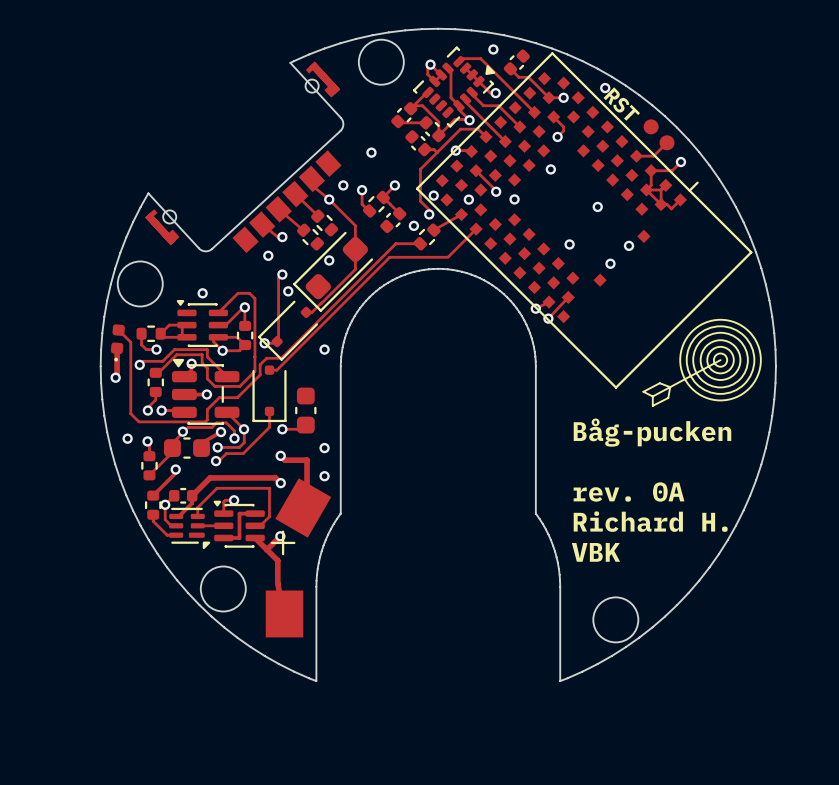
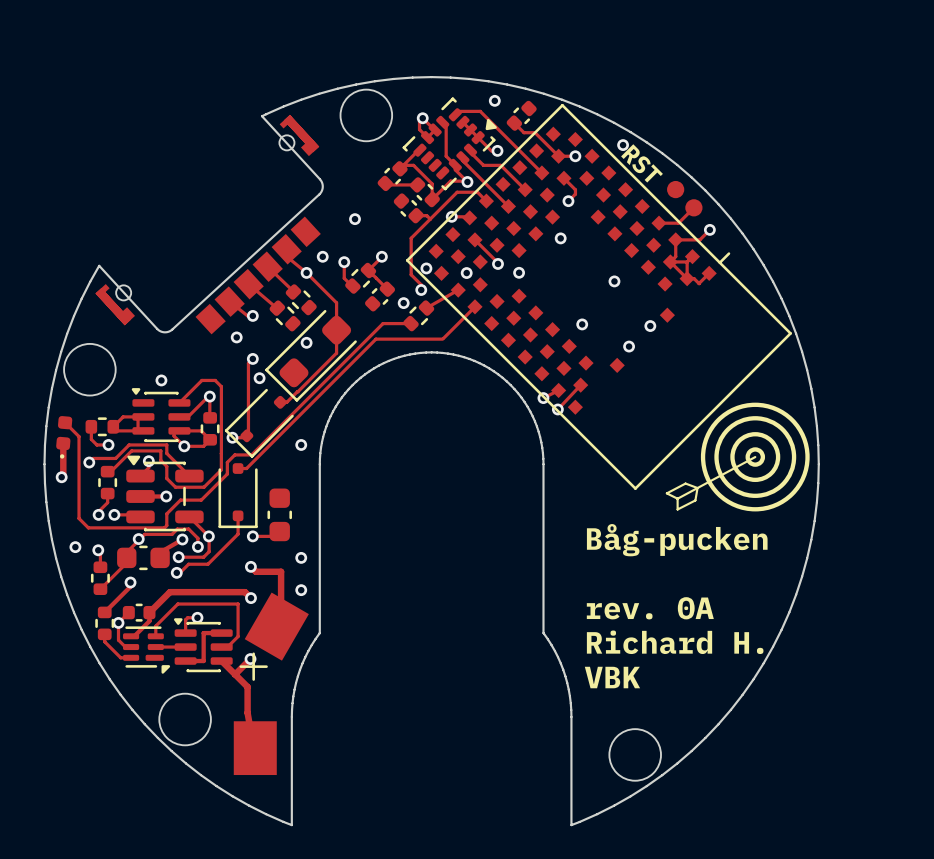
drawing: none -> [700, 402, 810, 512]
drawing: [679, 318, 762, 402] -> none

